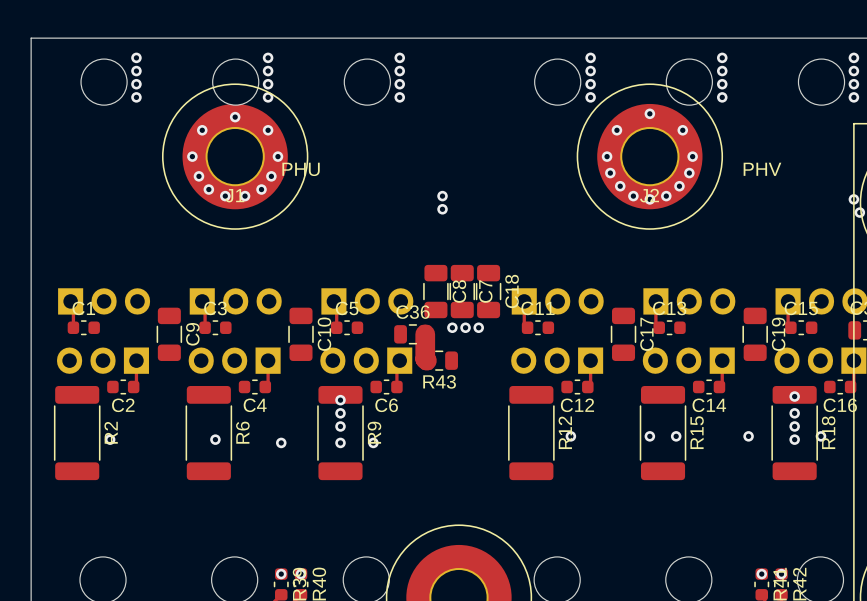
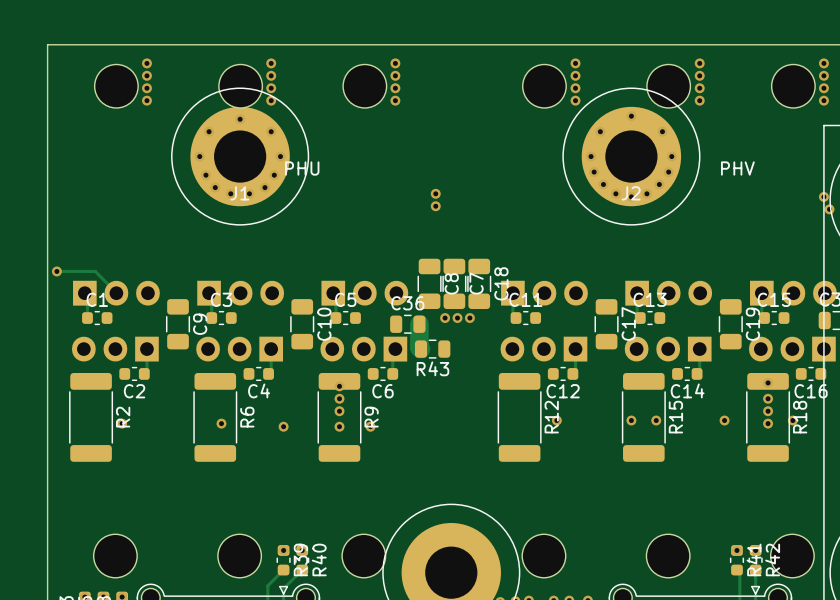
track: none -> (56, 271) (95, 271) (116, 293)
via: none -> (56, 271)

